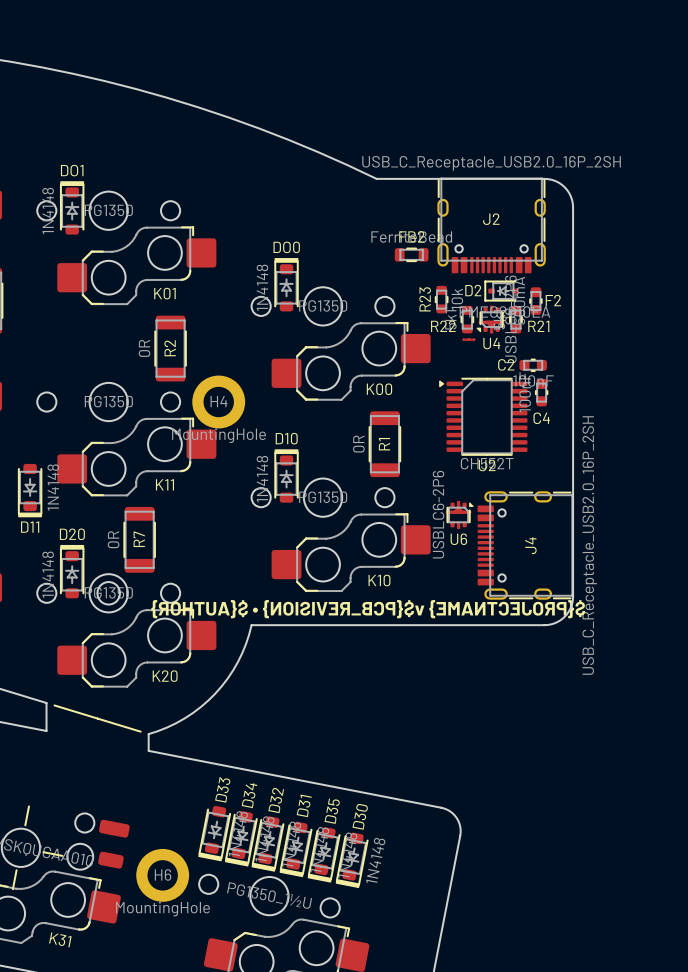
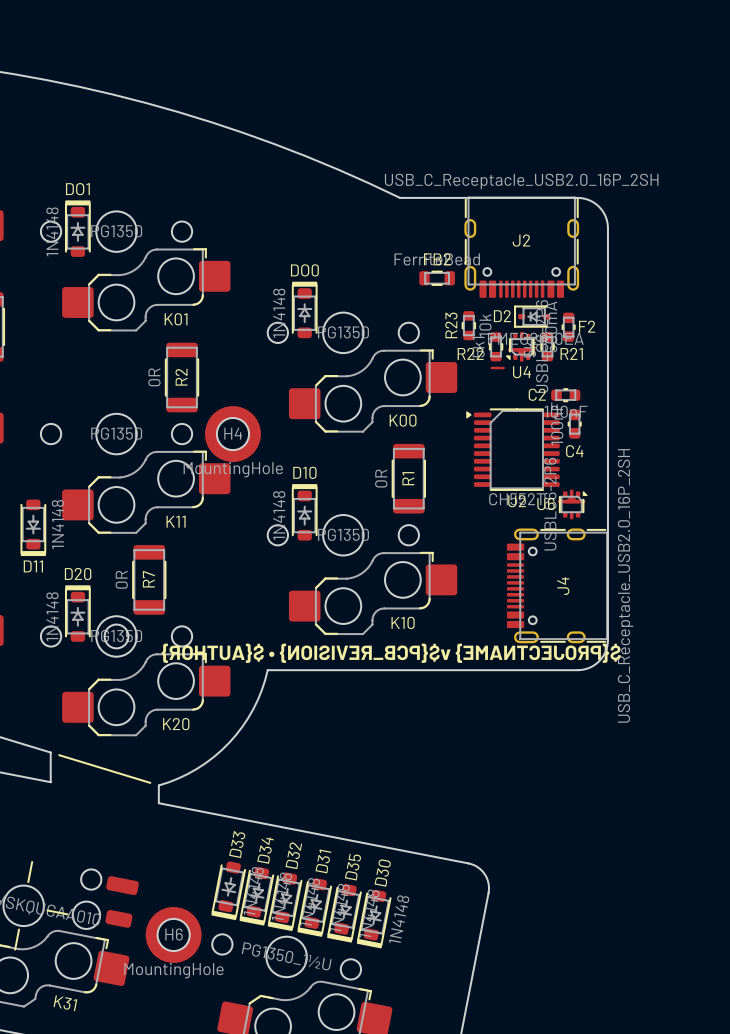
H4 footprint: [192, 375, 246, 429] -> [204, 406, 261, 463]
U6 position: (459, 514) -> (572, 504)
U6 name position: U6 (458, 539) -> U6 (546, 504)
H6 footprint: [136, 848, 190, 902] -> [145, 906, 202, 963]

